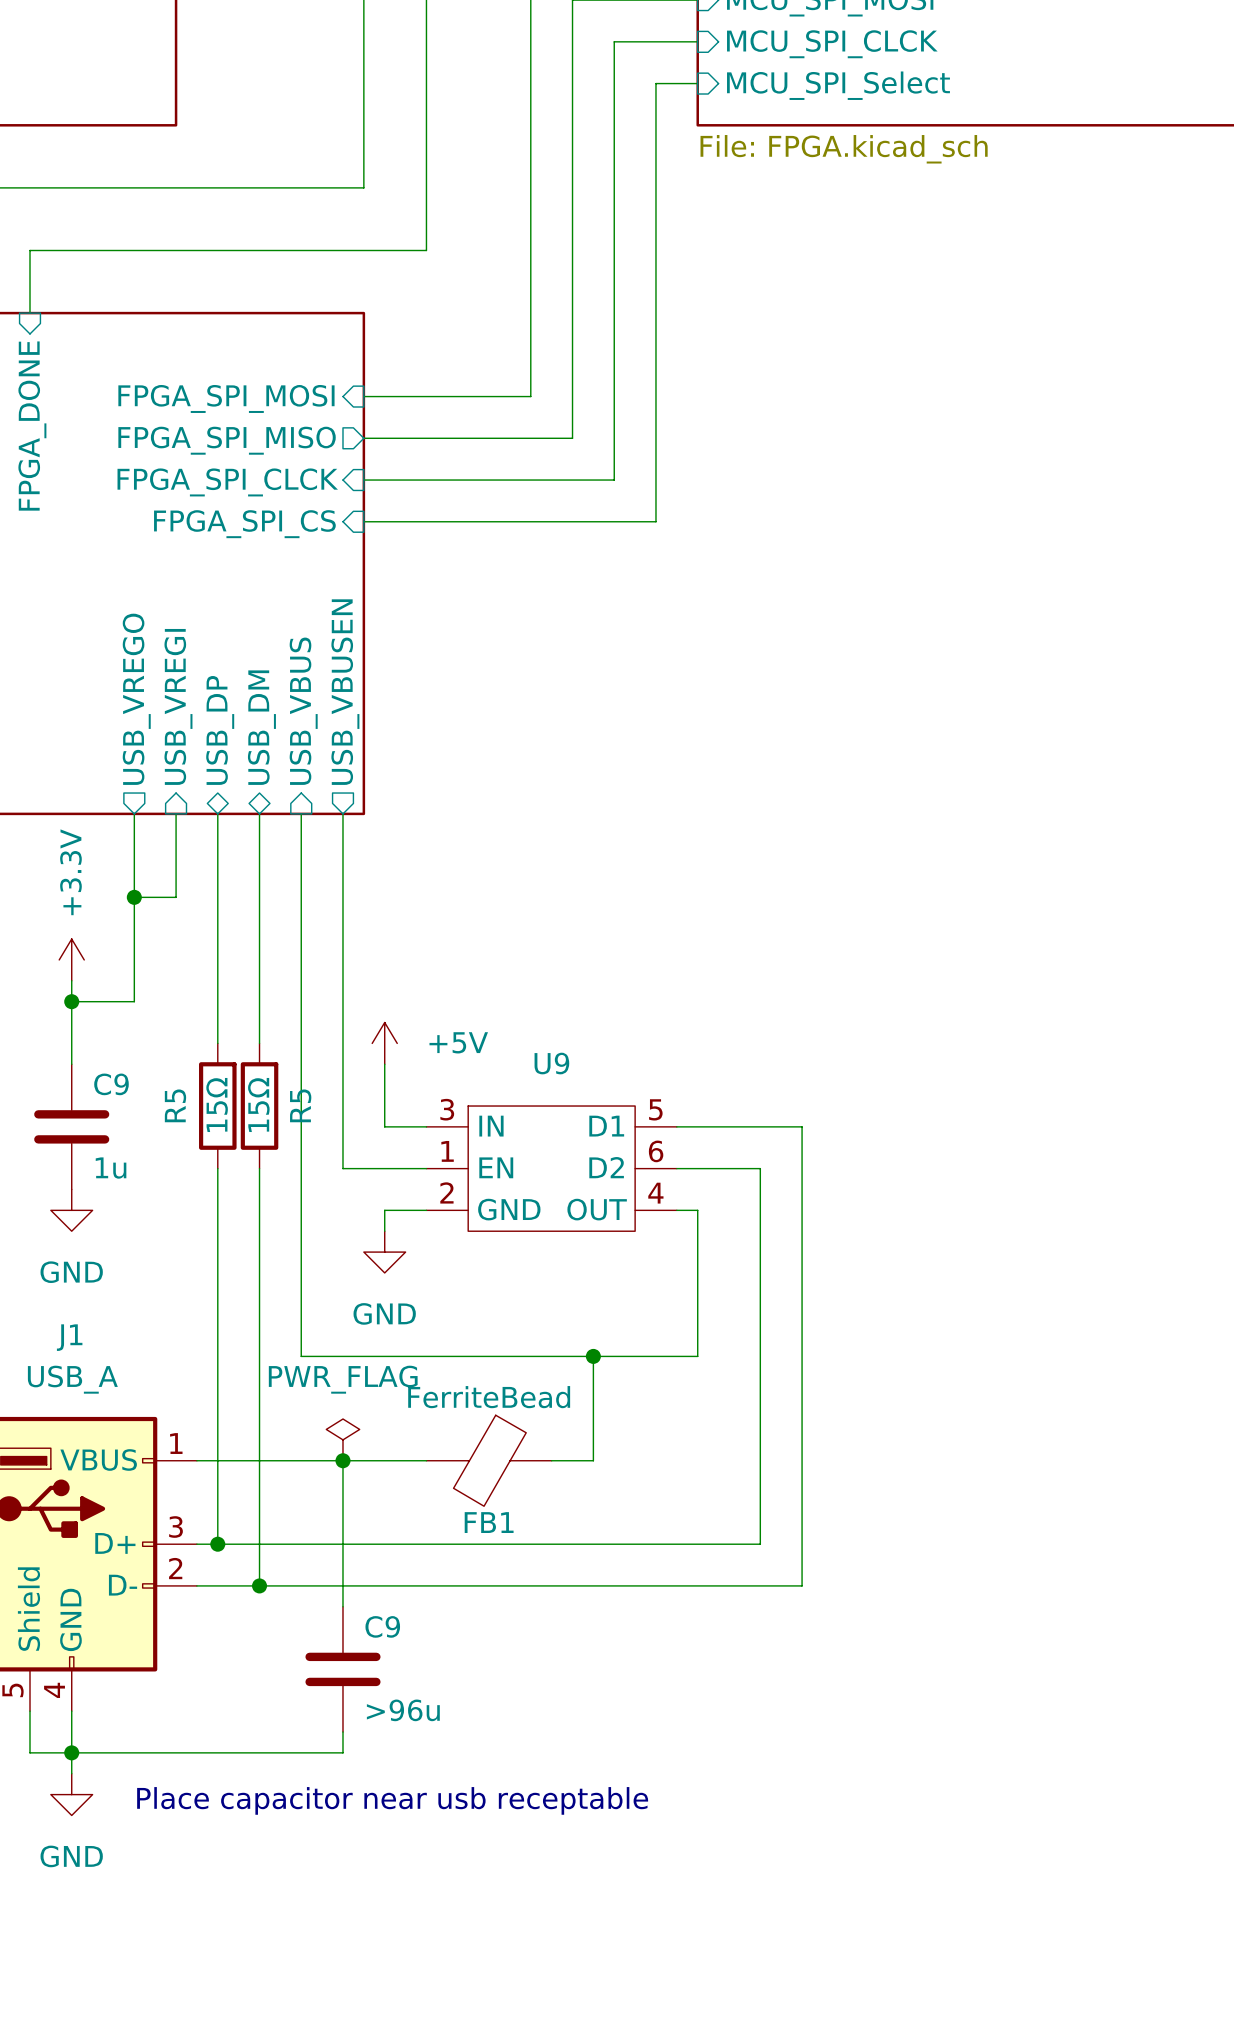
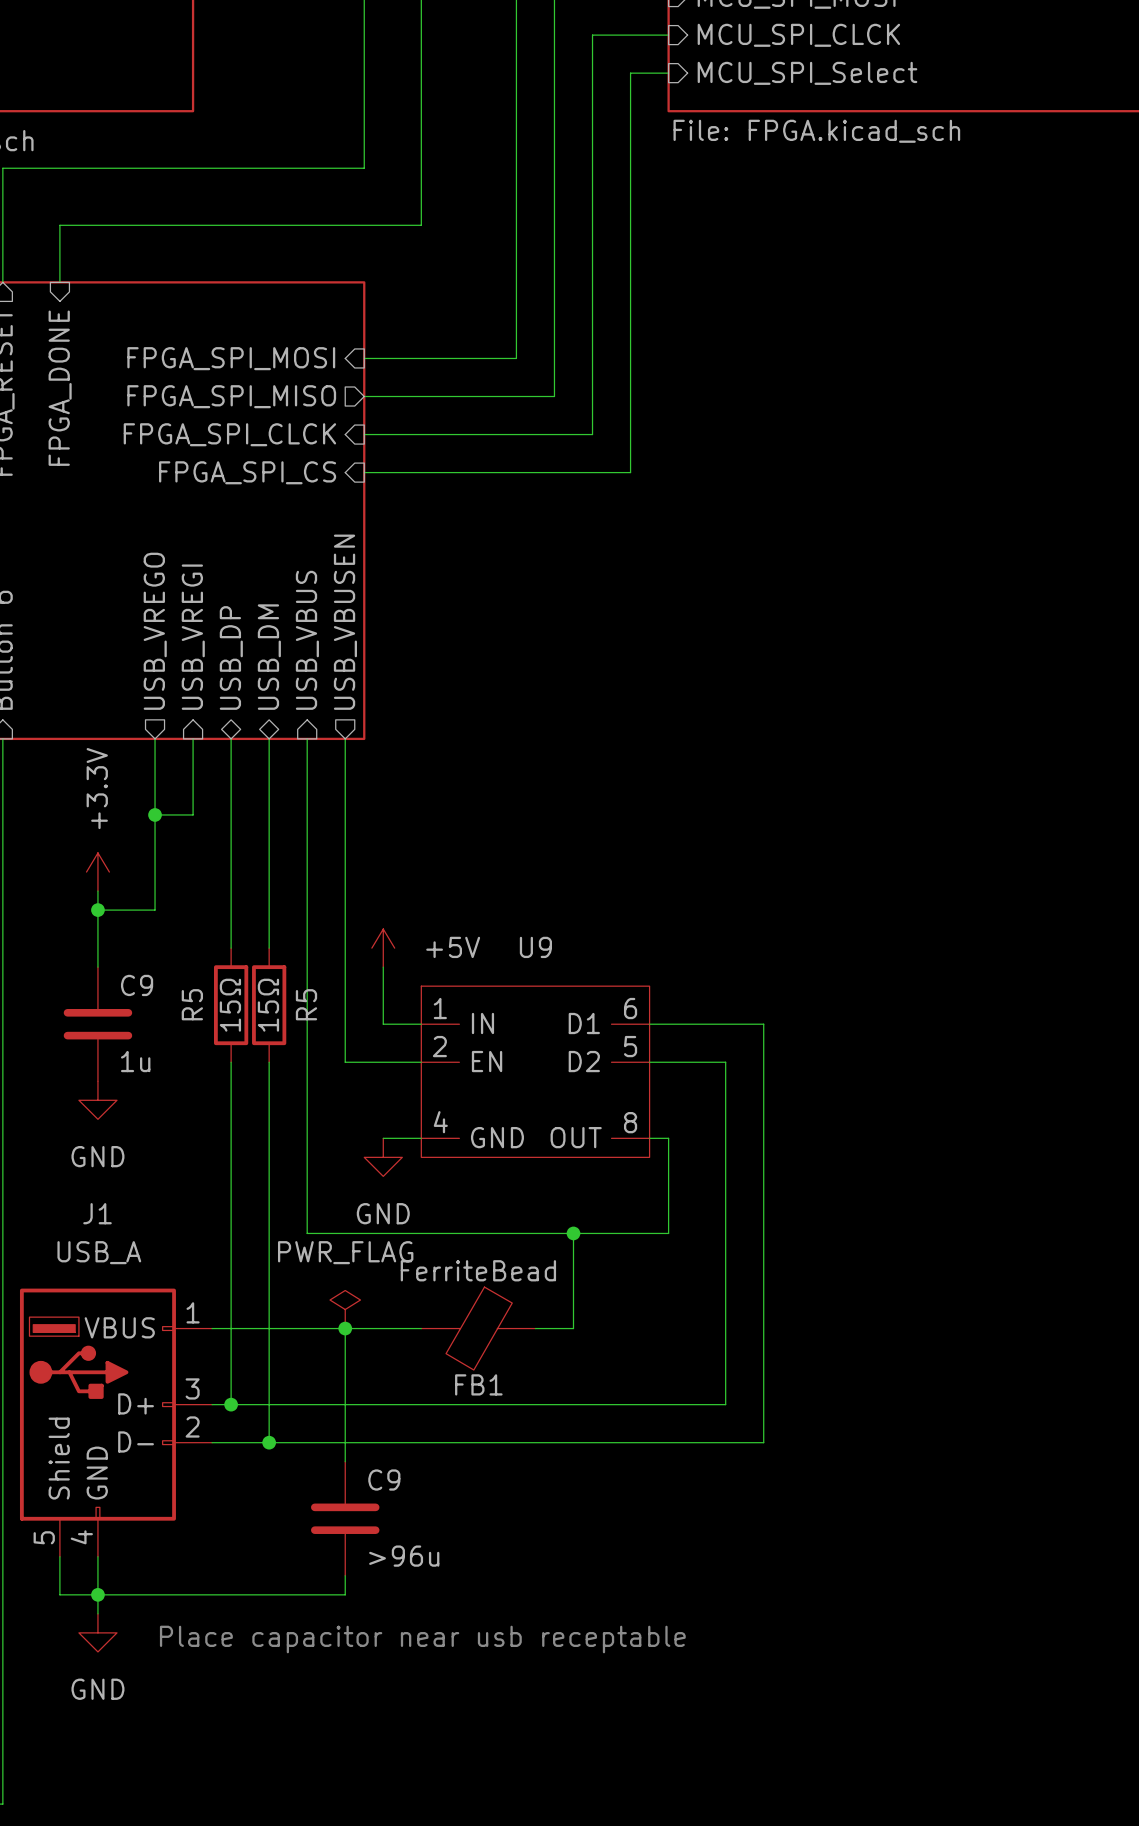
U9 symbol: [426, 1106, 677, 1232] -> [421, 986, 650, 1158]
wire: (426, 1210) (384, 1210) (384, 1231) -> none
wire: (676, 1210) (697, 1210) (697, 1252) -> (649, 1138) (668, 1138)
wire: none -> (383, 1138) (421, 1138)
power symbol position: GND (384, 1252) -> GND (383, 1157)

